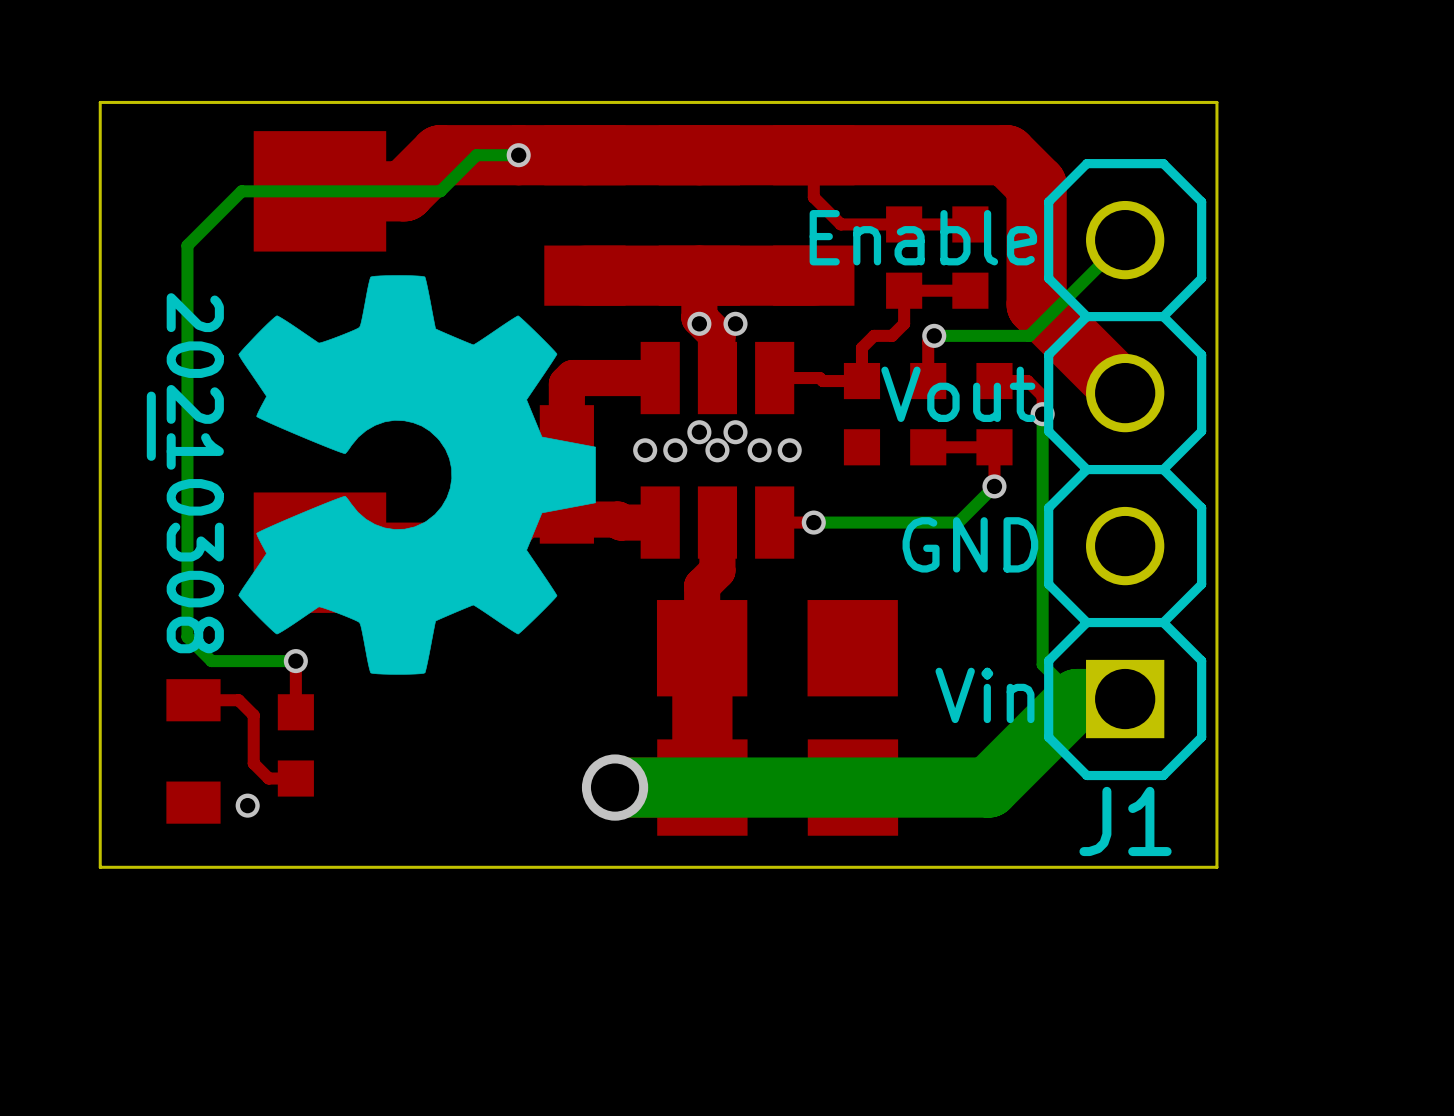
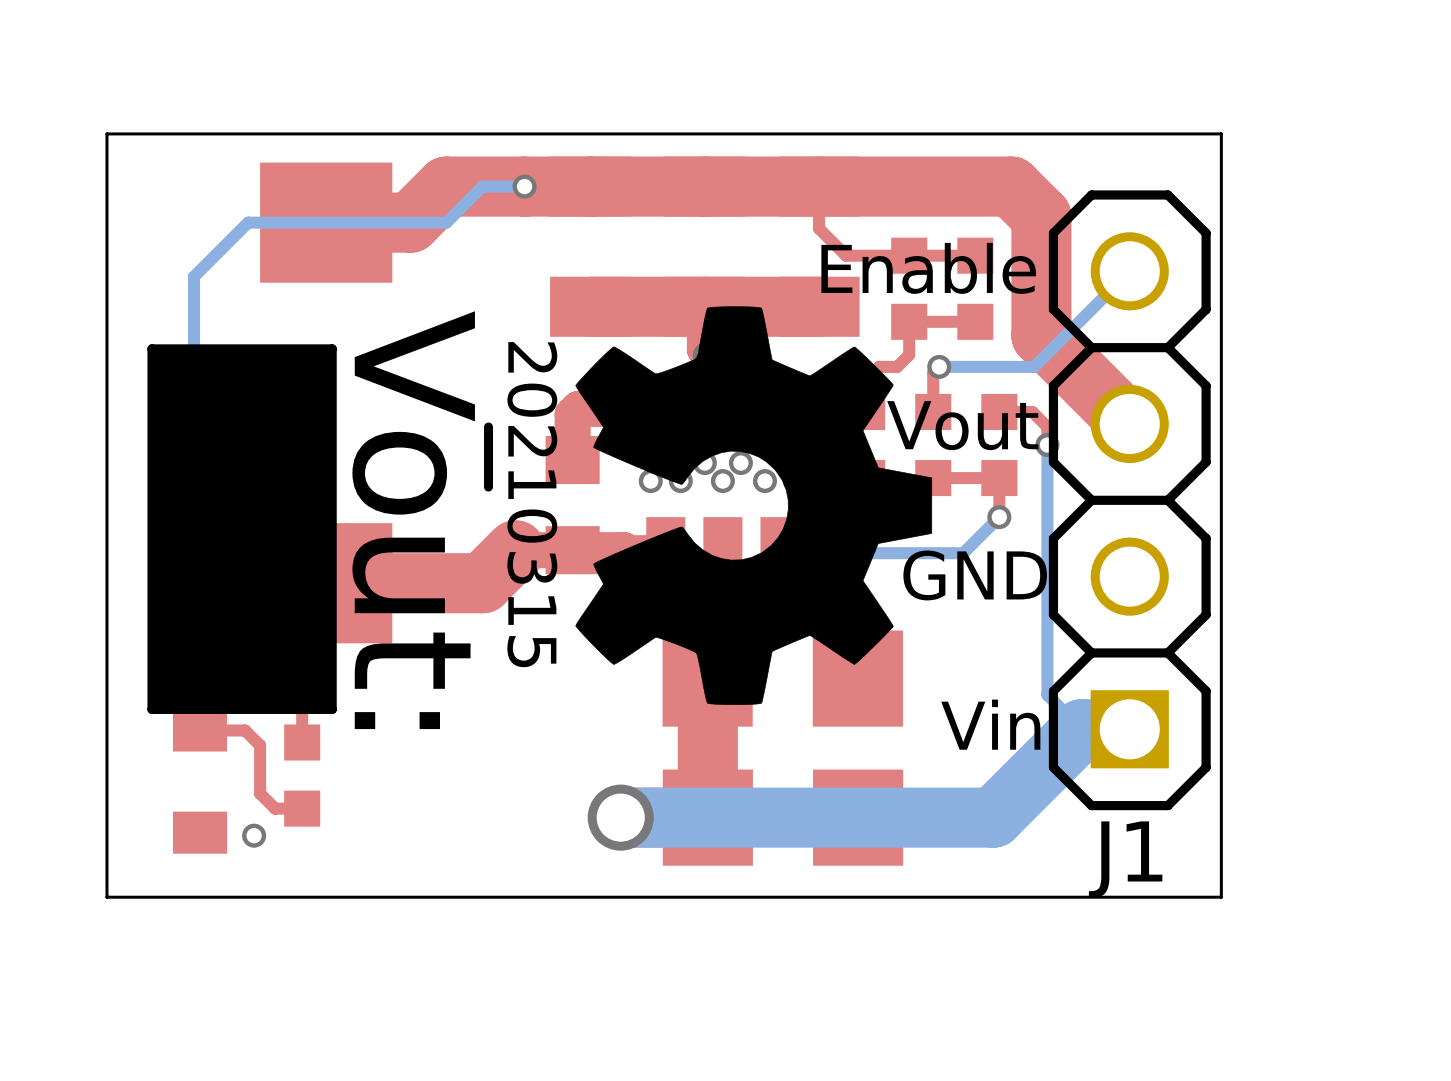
drawing: none -> [147, 344, 494, 714]
drawing: [146, 391, 156, 461] -> none
drawing position: (417, 474) -> (753, 505)

